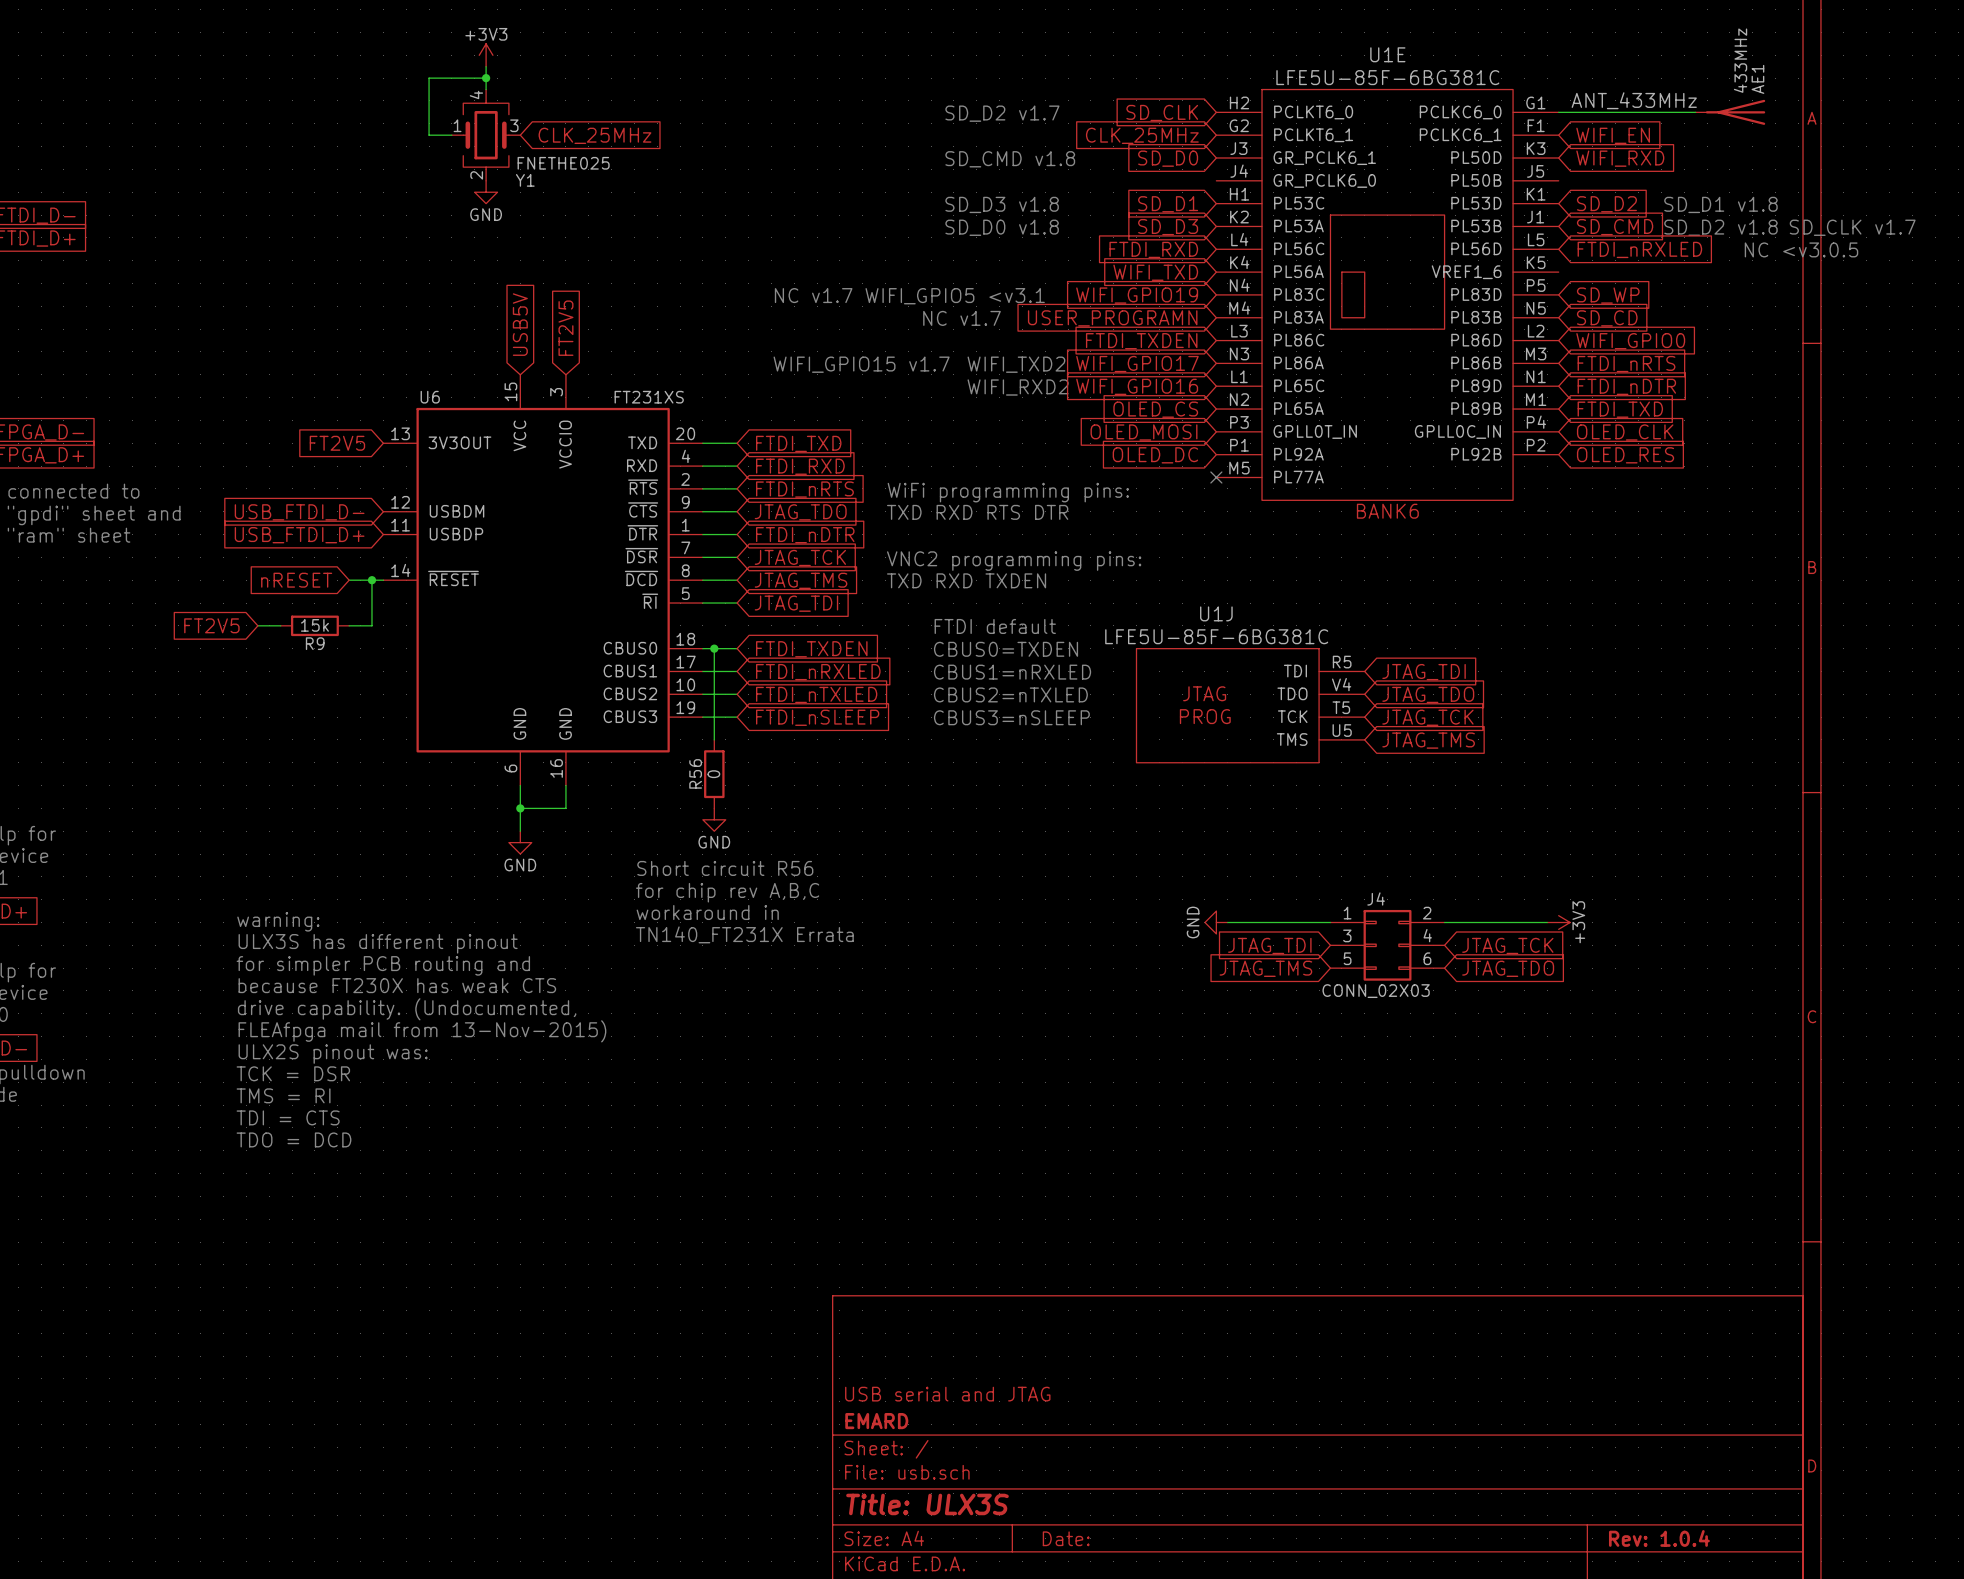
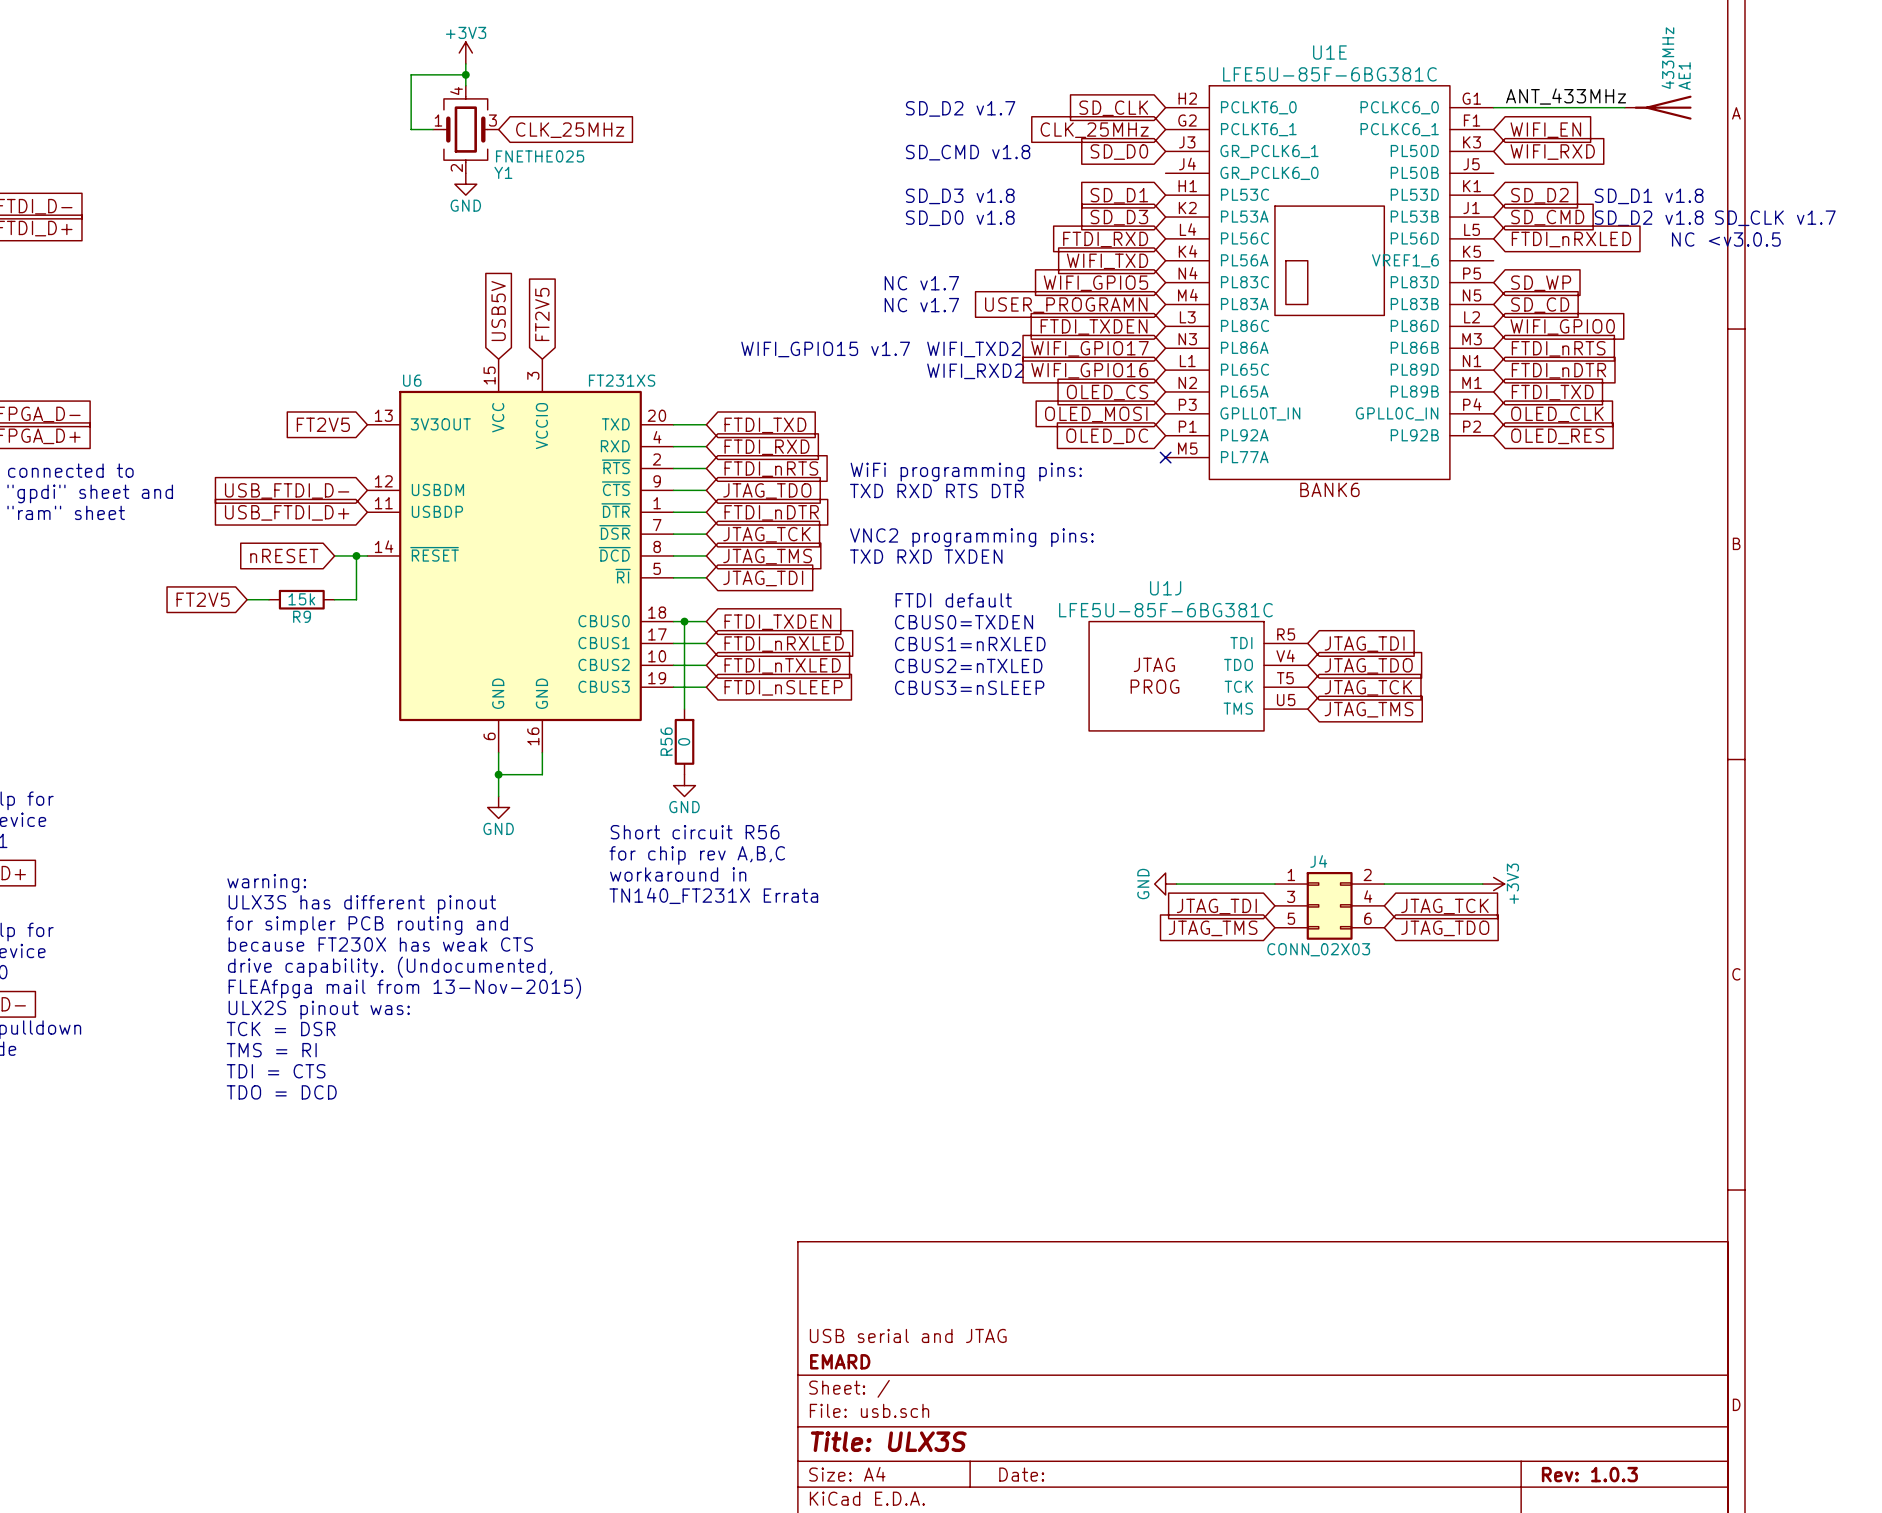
text: none -> NC v1.7 (921, 283)
global label: WIFI_GPIO19 (1137, 295) -> WIFI_GPIO5 (1095, 283)
text: NC v1.7 WIFI_GPIO5 <v3.1 (909, 296) -> none
title block: Rev: 1.0.4 (1659, 1538) -> Rev: 1.0.3 (1589, 1474)

